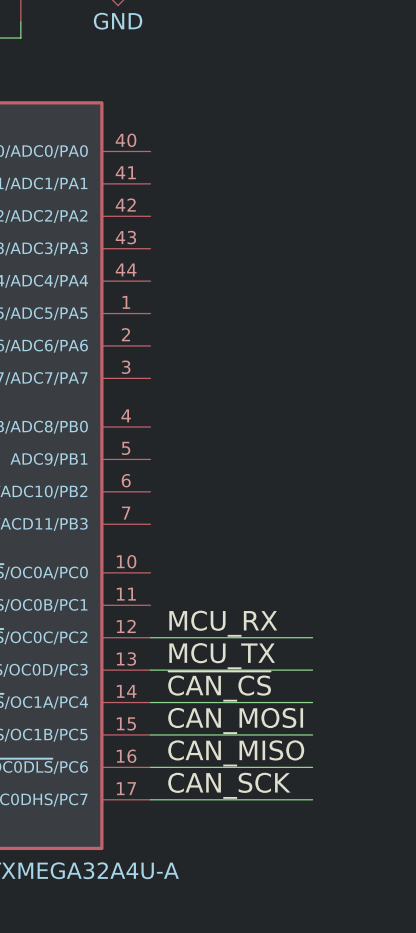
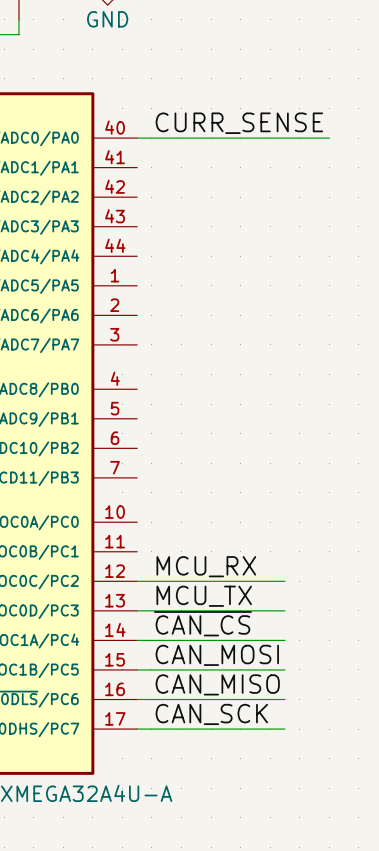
label: none -> CURR_SENSE (239, 123)
wire: none -> (137, 138) (329, 138)

